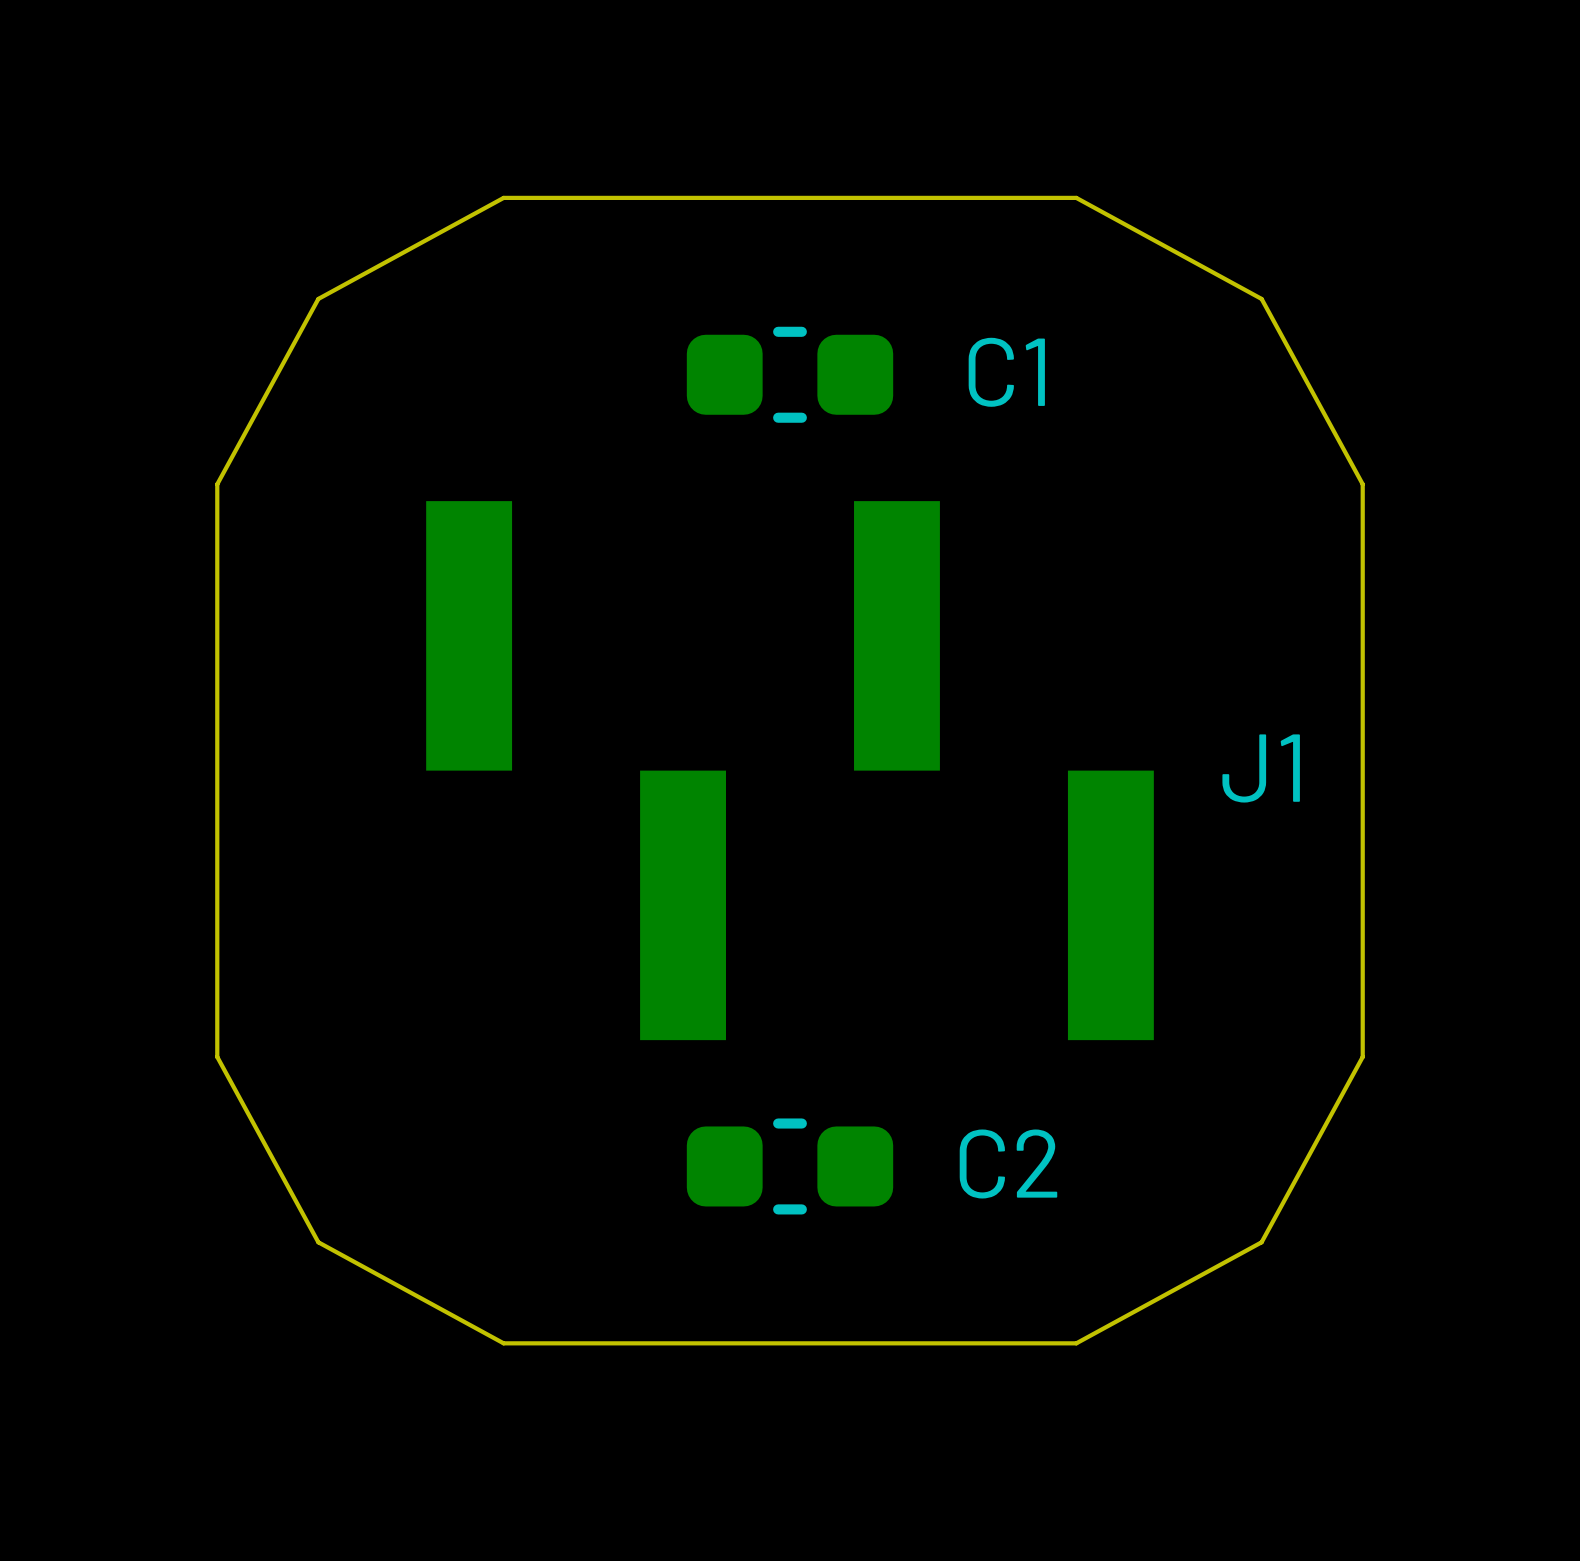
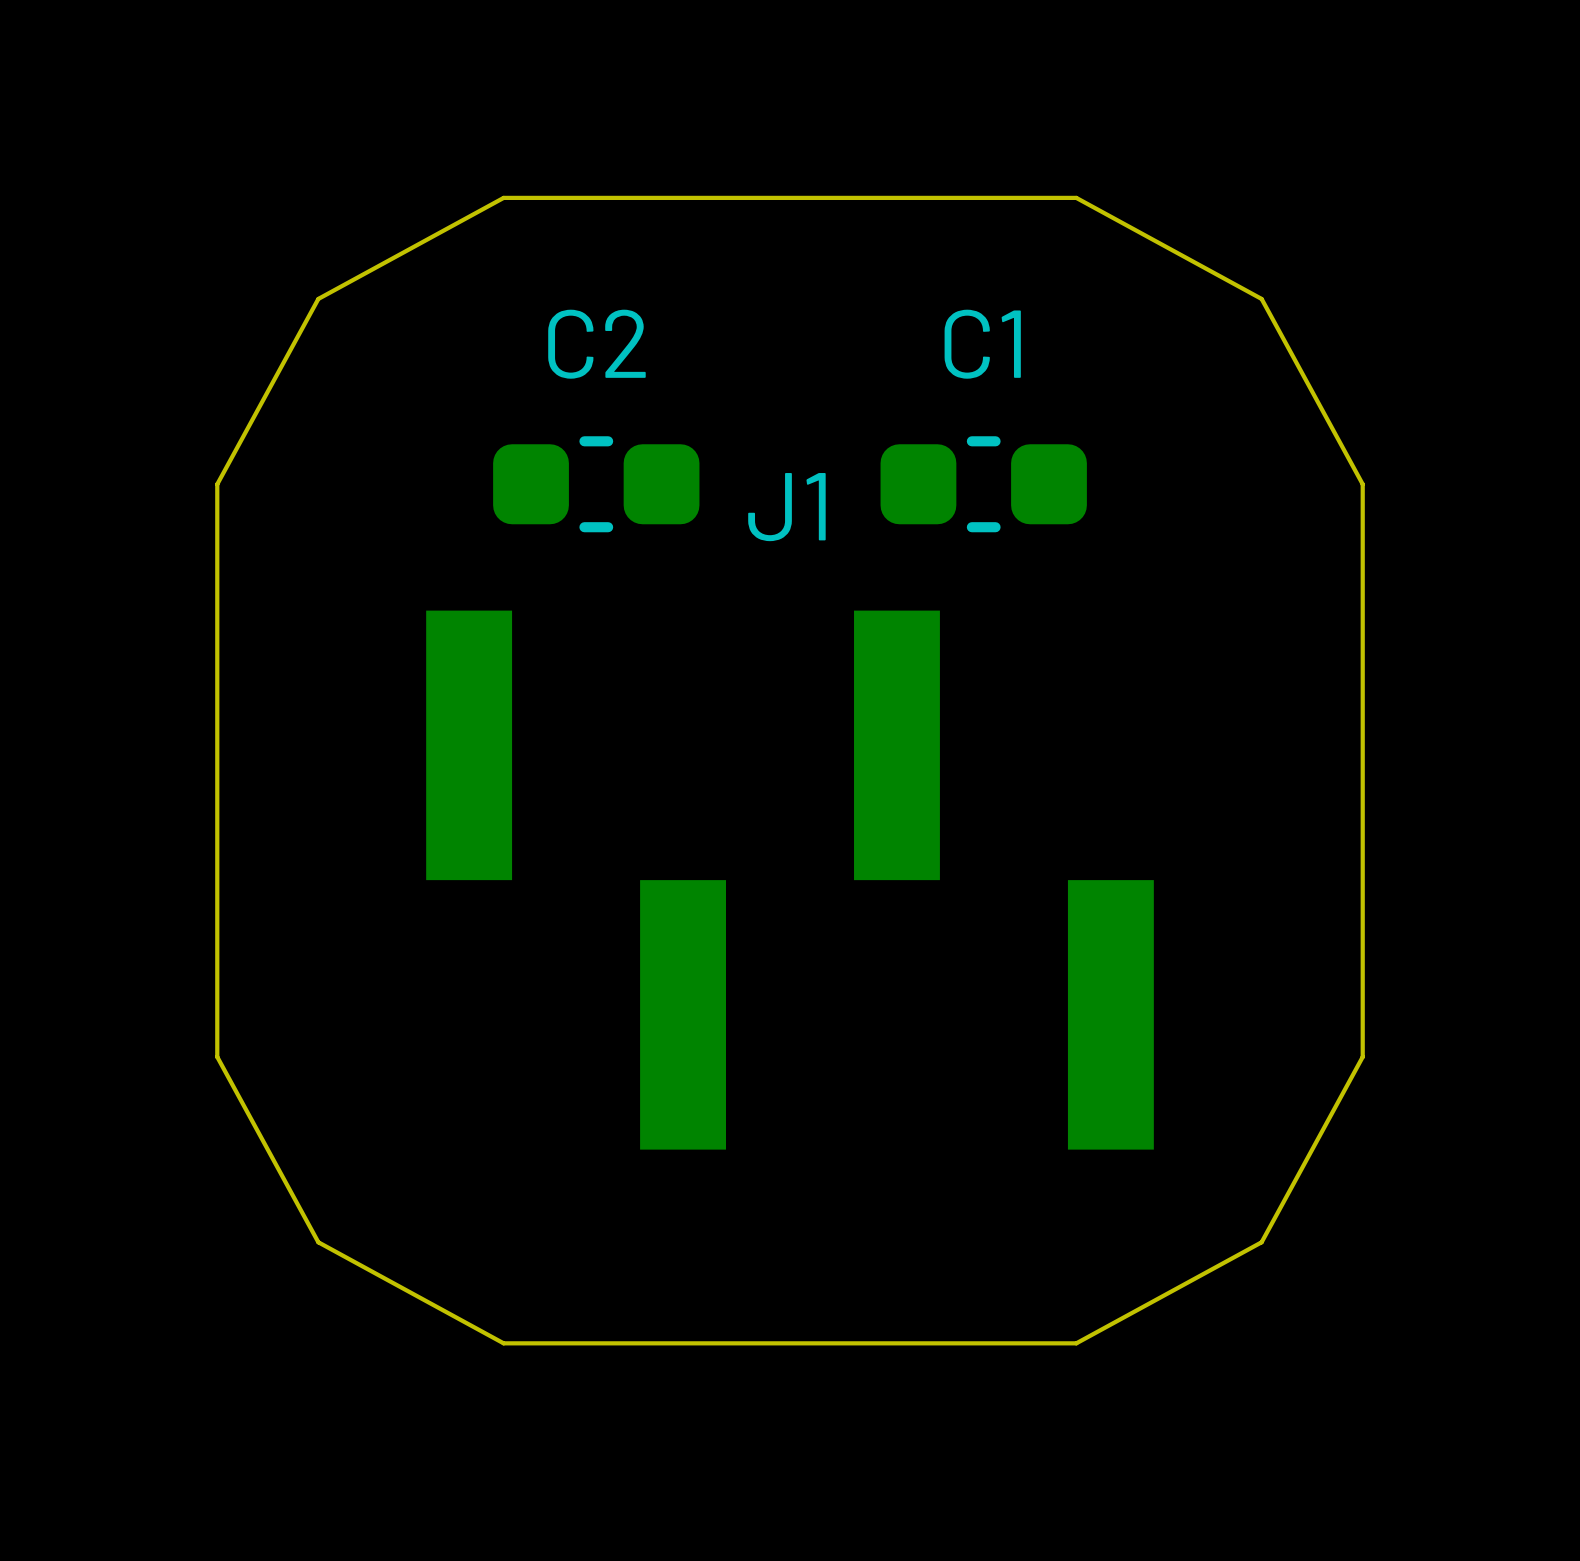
C1 name position: C1 (1006, 372) -> C1 (982, 344)
C1 position: (790, 374) -> (983, 484)
J1 name position: J1 (1261, 768) -> J1 (786, 507)
J1 position: (790, 770) -> (790, 880)
C2 name position: C2 (1008, 1164) -> C2 (596, 344)
C2 position: (790, 1166) -> (596, 484)

